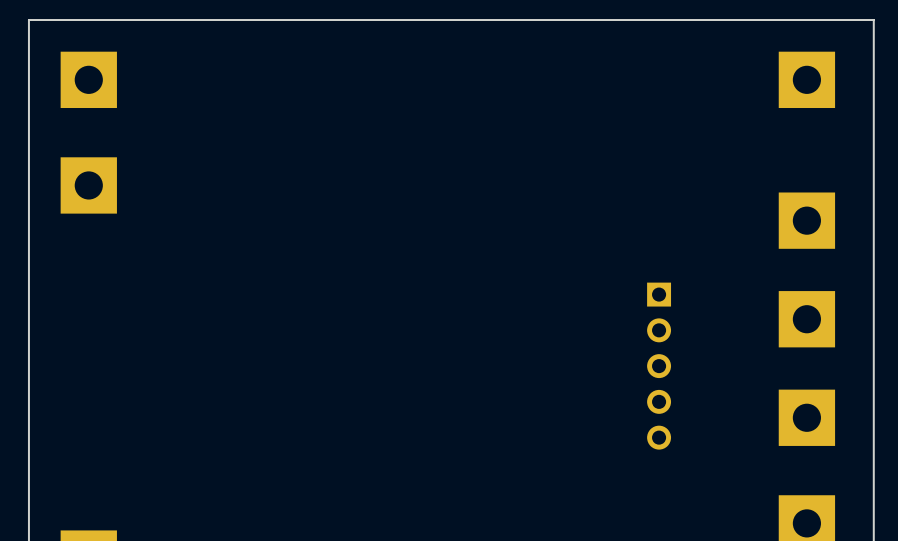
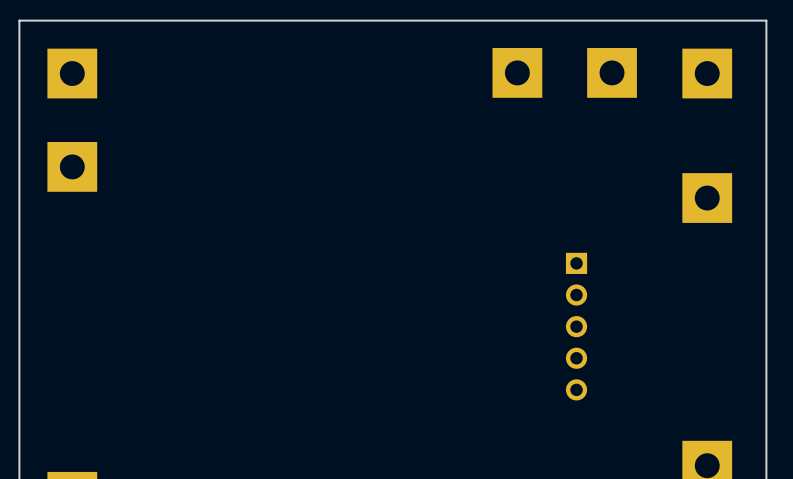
part: none -> (517, 72)
part: none -> (612, 72)
part: (806, 319) -> none
part: (806, 417) -> none

